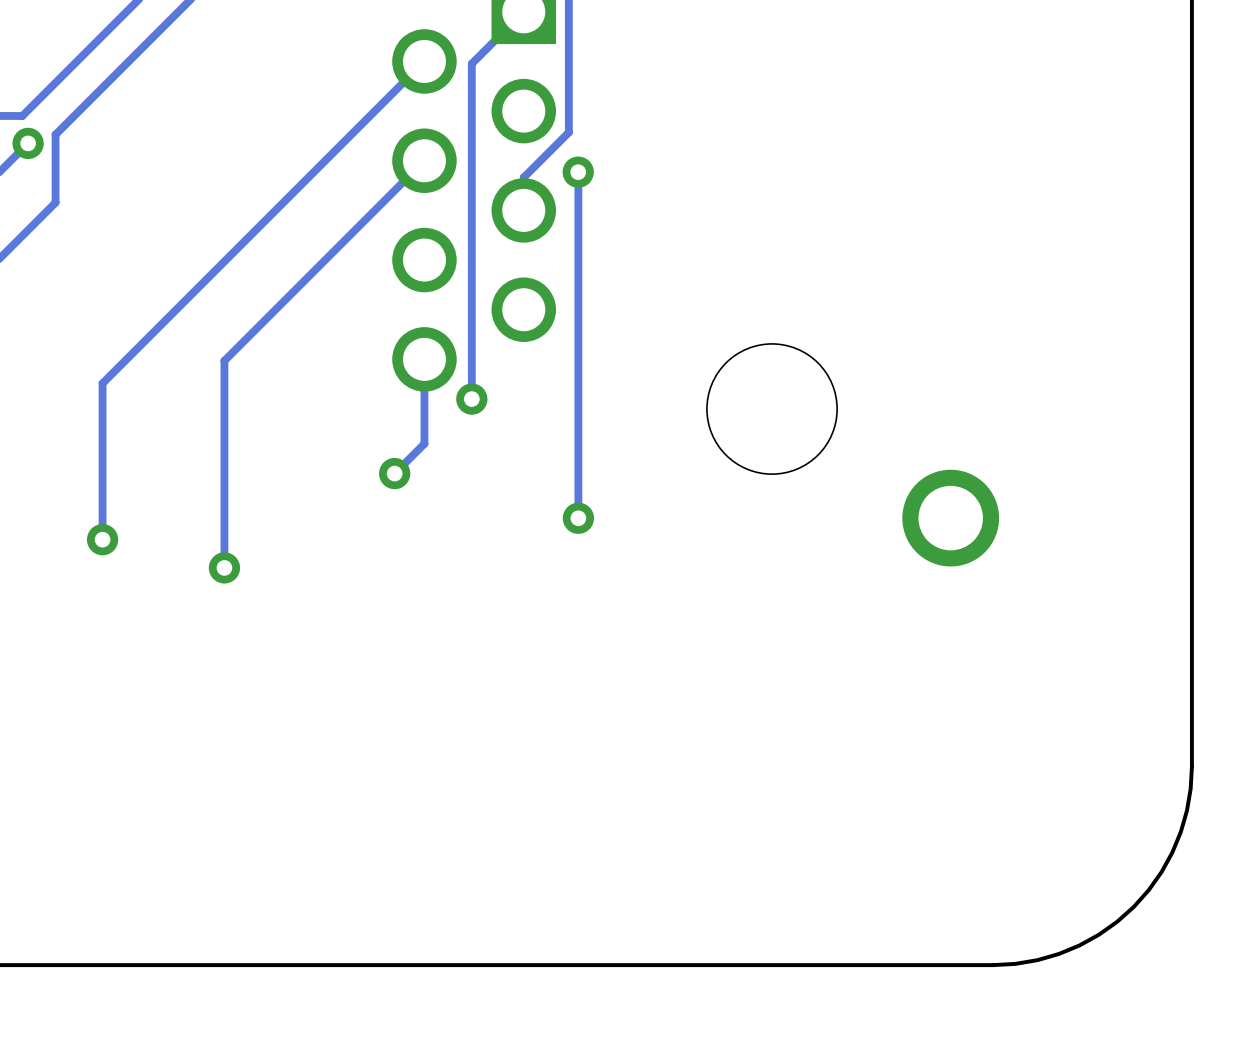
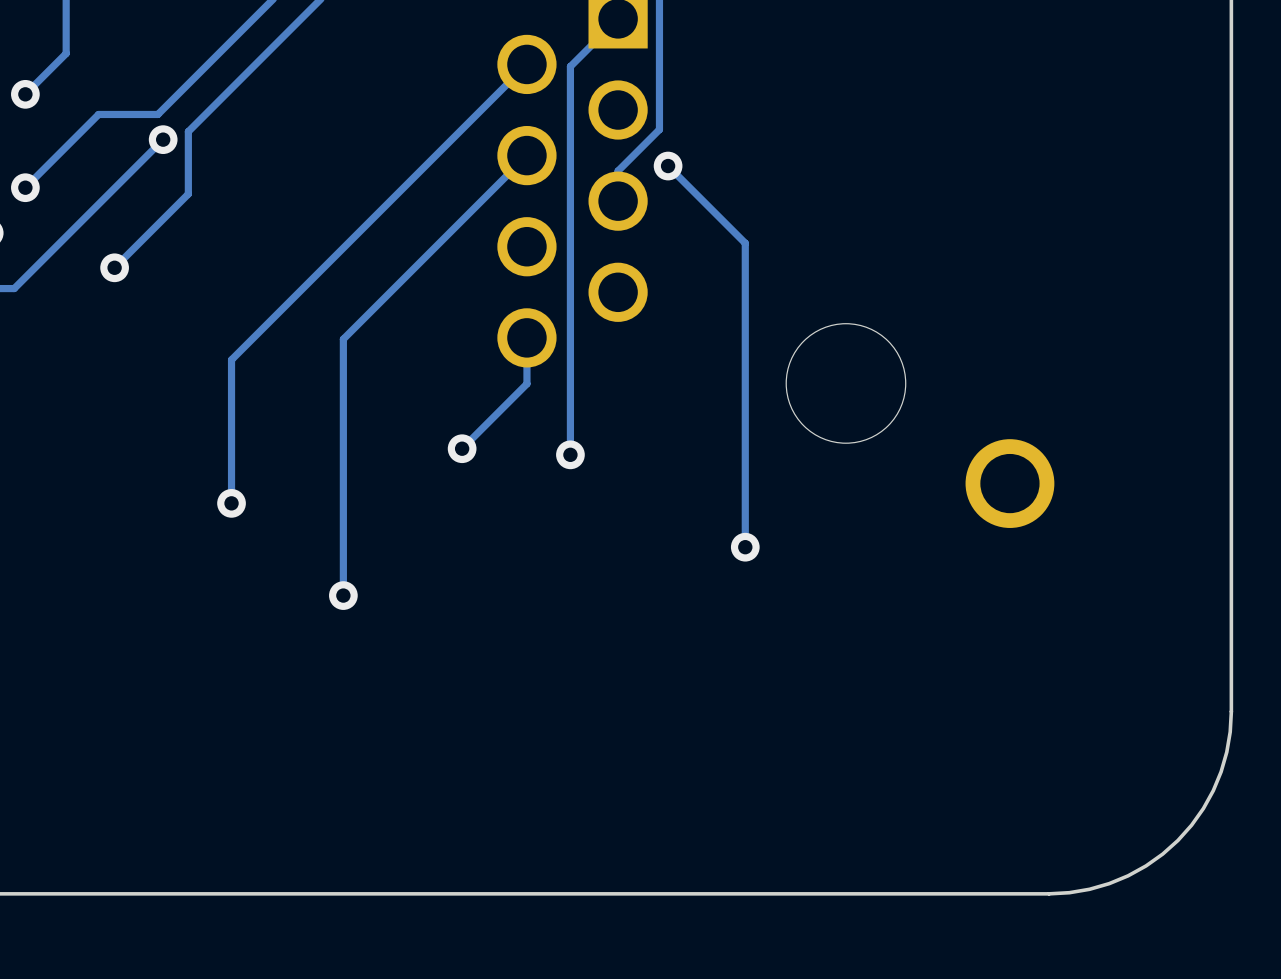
track: (578, 172) (578, 518) -> (668, 166) (745, 243) (745, 547)
track: none -> (570, 374) (570, 454)
via: (471, 399) -> none
track: (424, 409) (424, 443) (394, 473) -> (526, 383) (462, 448)
via: (394, 473) -> none
via: none -> (462, 448)
via: none -> (570, 454)
via: (578, 518) -> none
track: none -> (343, 529) (343, 595)
via position: (224, 567) -> (343, 595)
via: none -> (745, 547)

